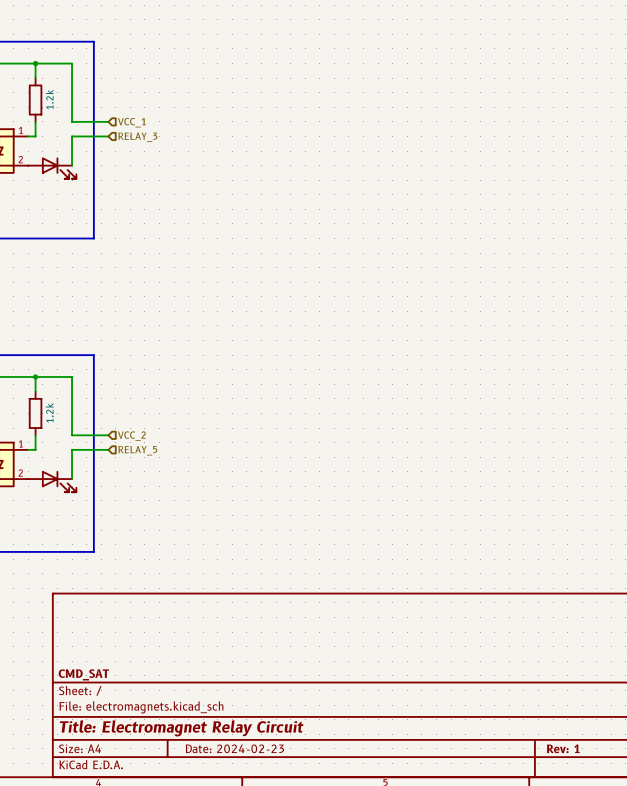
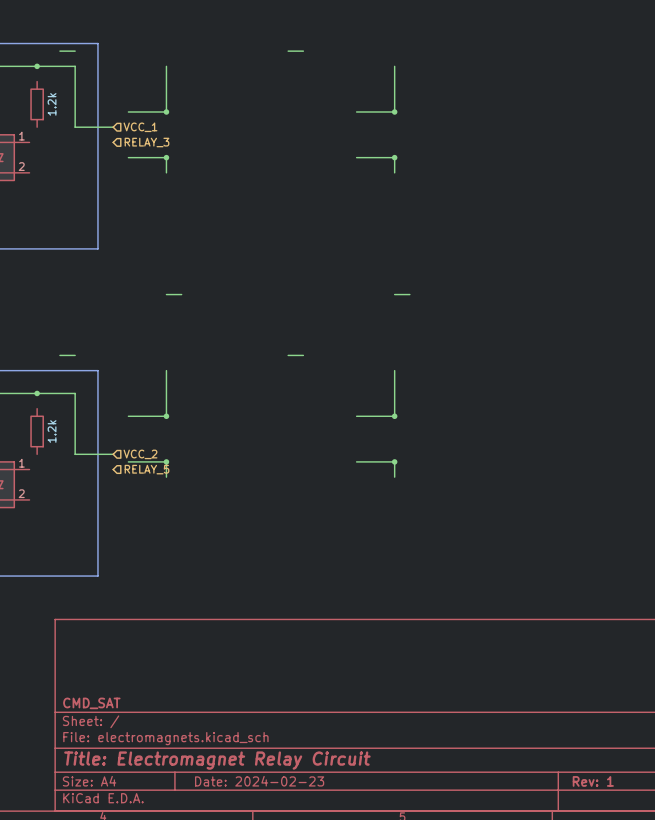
wire: none -> (59, 51) (75, 51)
wire: none -> (288, 51) (303, 51)
wire: (35, 63) (35, 78) -> none
wire: none -> (166, 66) (166, 111) (128, 111)
wire: none -> (394, 66) (394, 111) (356, 111)
junction: none -> (166, 111)
junction: none -> (394, 111)
wire: (35, 121) (35, 136) (28, 136) -> none
wire: (108, 136) (72, 136) (72, 165) -> none
wire: none -> (128, 157) (166, 157) (166, 172)
junction: none -> (166, 157)
wire: none -> (356, 157) (394, 157) (394, 172)
junction: none -> (394, 157)
part: (52, 168) -> none
wire: none -> (166, 294) (181, 294)
wire: none -> (394, 294) (409, 294)
wire: none -> (59, 355) (75, 355)
wire: none -> (288, 355) (303, 355)
wire: none -> (166, 370) (166, 416) (128, 416)
wire: none -> (394, 370) (394, 416) (356, 416)
wire: (35, 377) (35, 391) -> none
junction: none -> (166, 416)
junction: none -> (394, 416)
wire: (35, 435) (35, 449) (28, 449) -> none
wire: none -> (128, 461) (166, 461) (166, 477)
junction: none -> (166, 461)
wire: none -> (356, 461) (394, 461) (394, 477)
junction: none -> (394, 461)
wire: (108, 449) (72, 449) (72, 479) -> none
part: (52, 481) -> none

